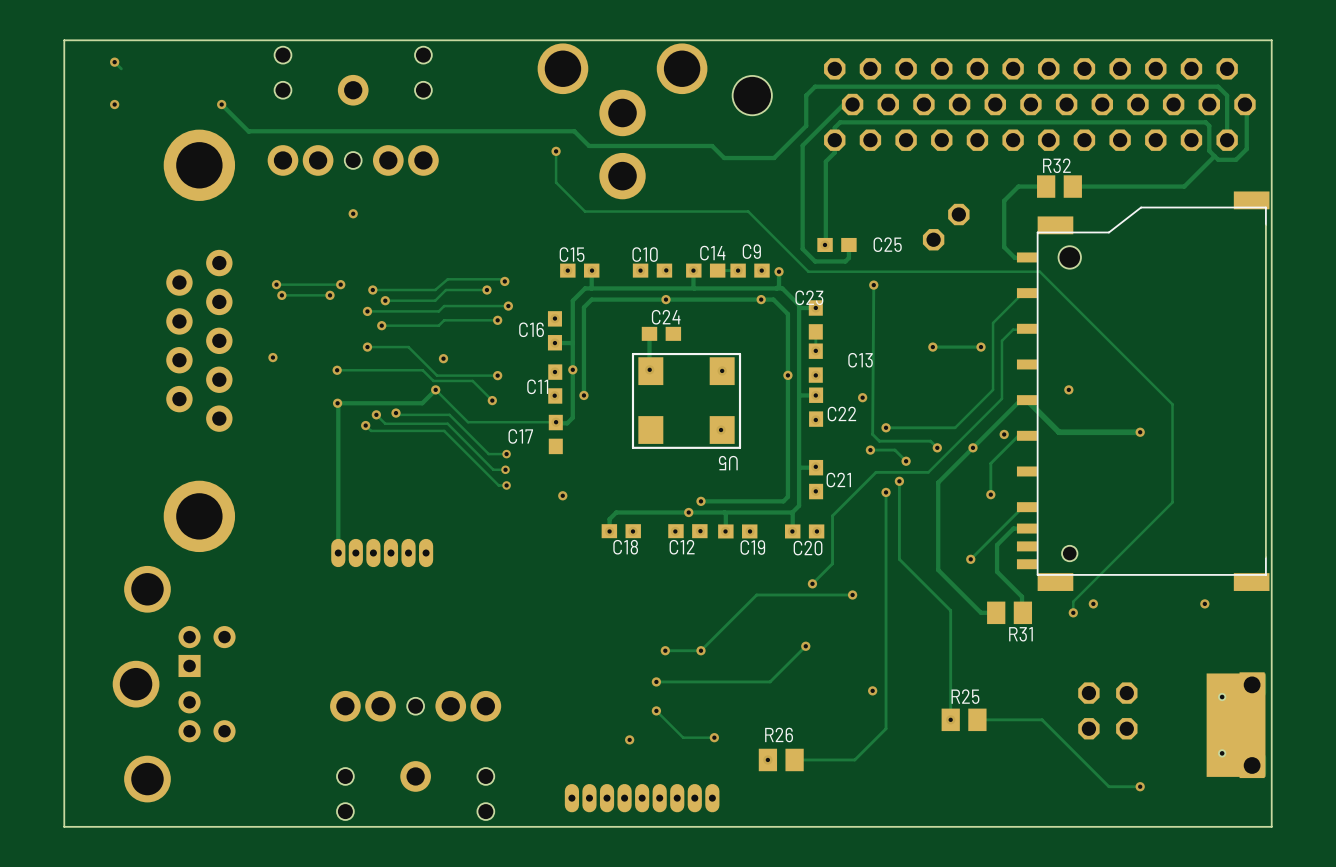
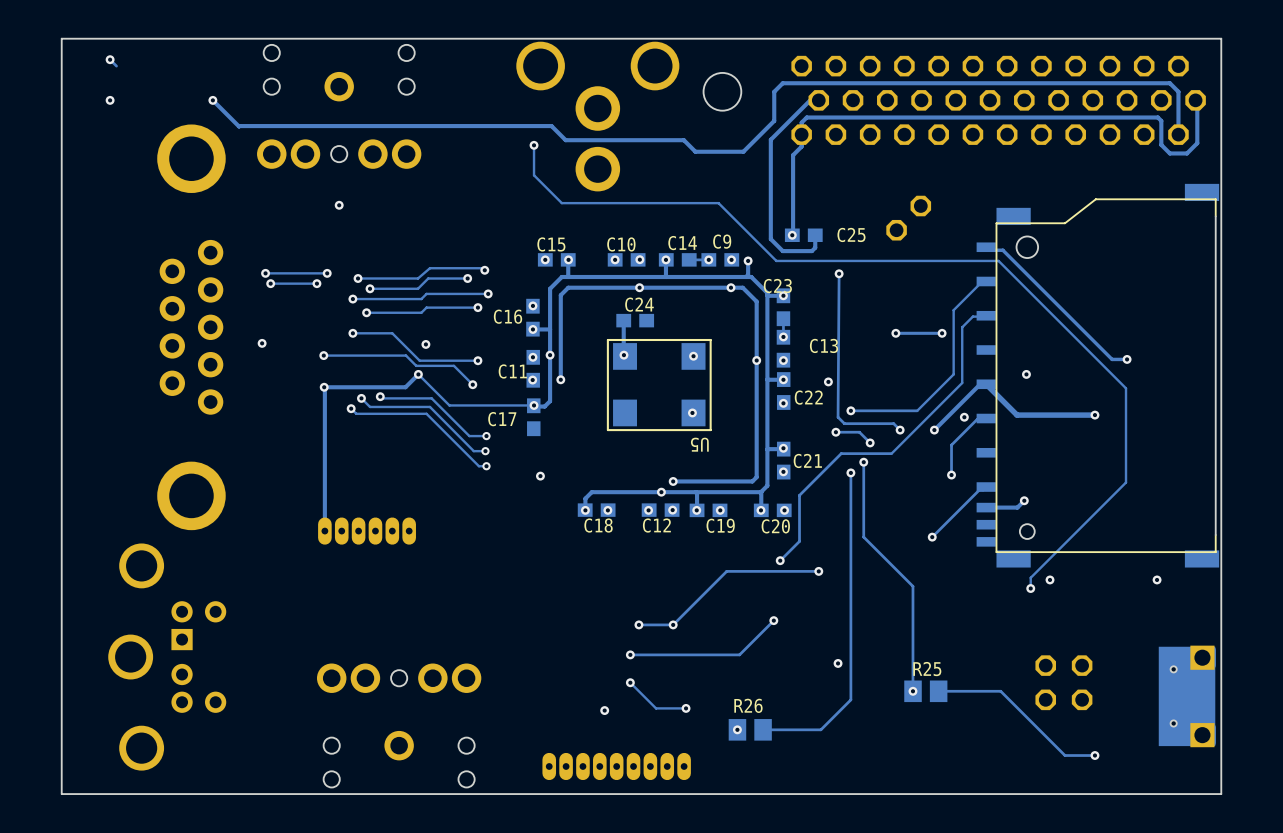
track: (1214, 156) (1184, 186) (1072, 186) -> none
track: (1046, 186) (1018, 186) (1004, 200) (1004, 247) (1014, 257) (1026, 257) -> (1127, 359) (1112, 359) (1002, 250) (990, 250) (986, 247)
R32: (1059, 186) -> none
via: none -> (1127, 359)
track: (972, 447) (938, 482) (938, 570) (981, 612) (996, 612) -> none
via: none -> (1024, 500)
track: (1026, 528) (1013, 528) (997, 545) (997, 571) (1022, 596) (1022, 612) -> (986, 507) (1017, 507) (1024, 500)
R31: (1009, 612) -> none

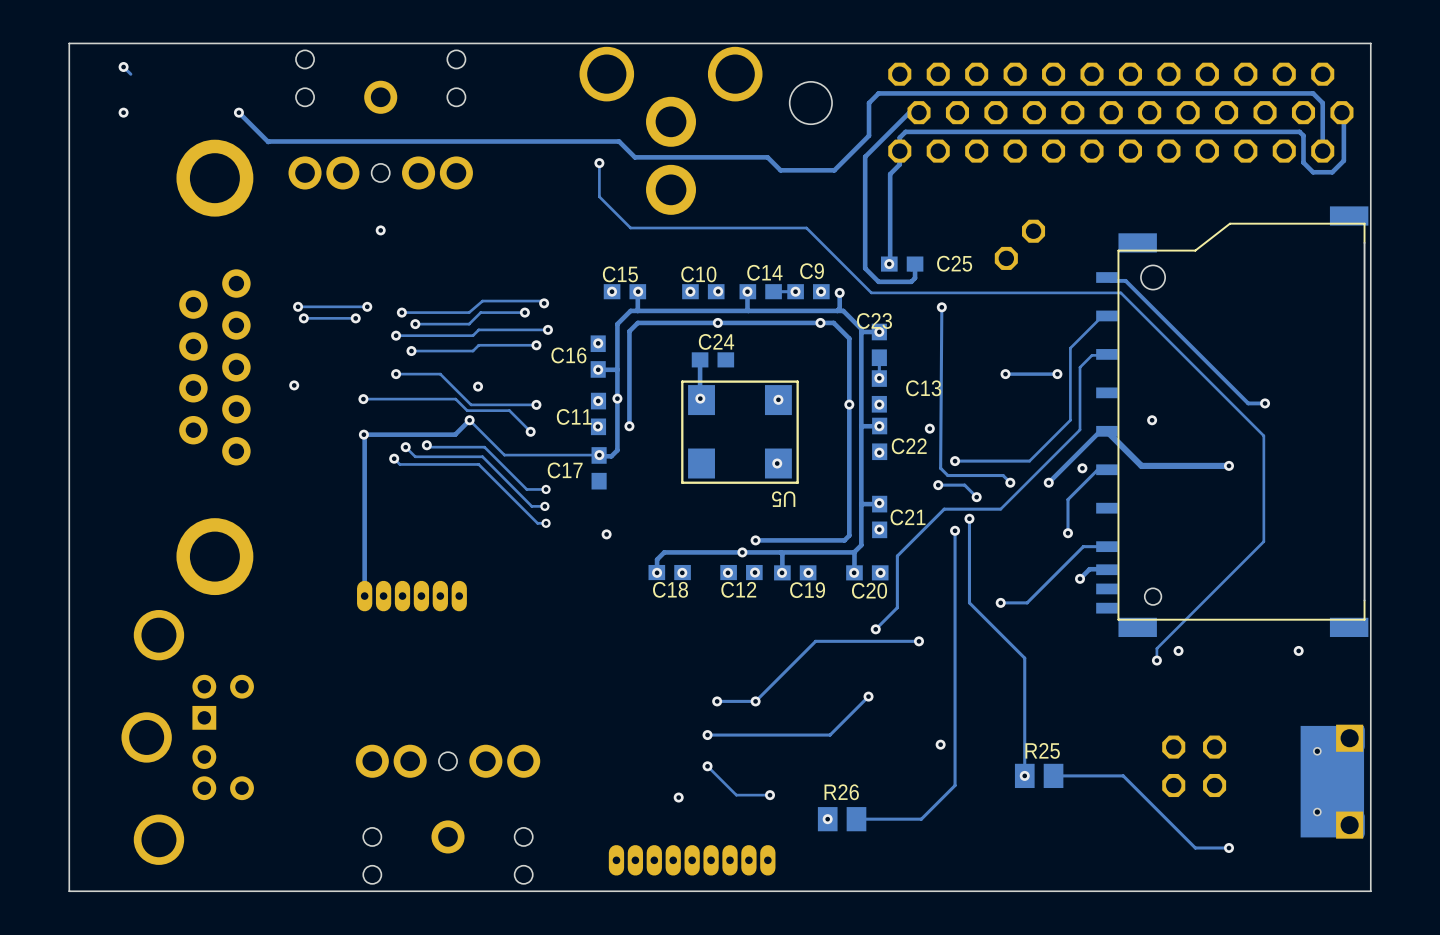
track: (986, 487) (983, 490) (979, 490) (932, 537) -> (1106, 546) (1083, 546) (1027, 602) (1000, 602)
track: (1024, 500) (1017, 507) (986, 507) -> (1080, 578) (1089, 569) (1106, 569)
via: (1024, 500) -> none
via: none -> (1080, 578)
via: none -> (1000, 602)
via: (932, 537) -> none

